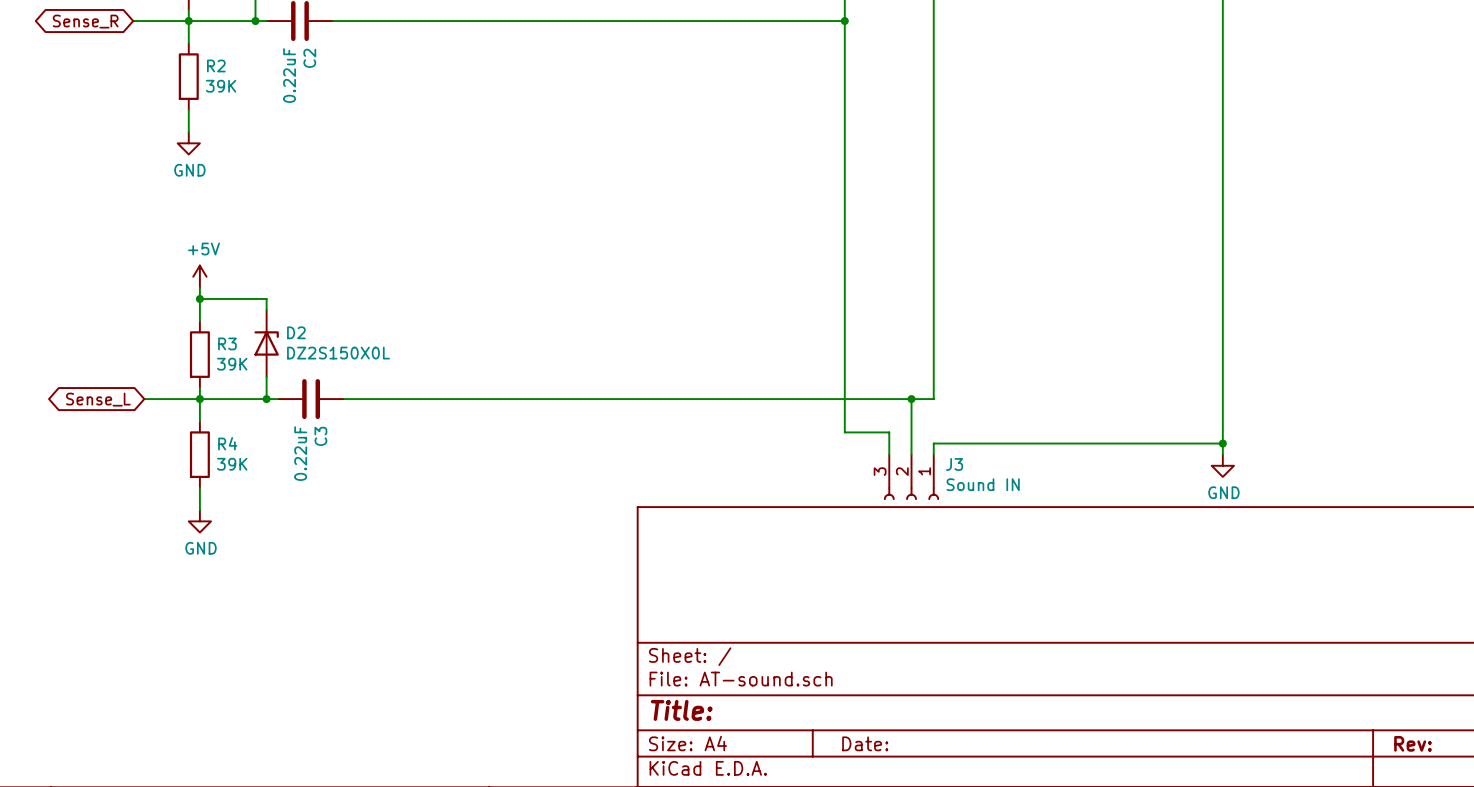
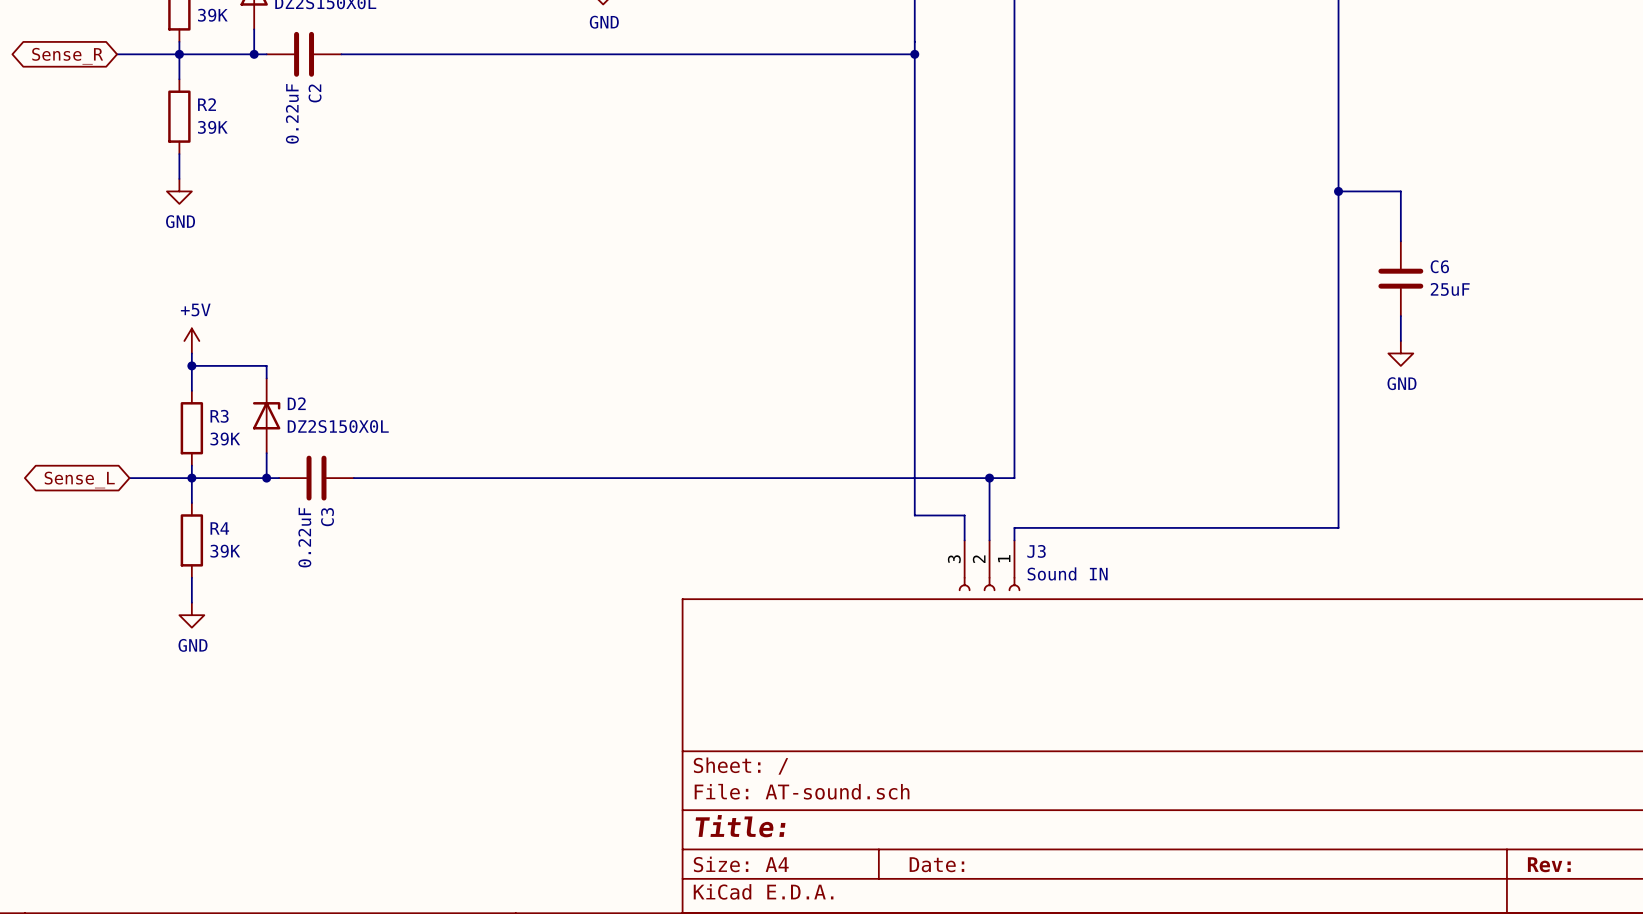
wire: none -> (1338, 191) (1400, 191) (1400, 241)
junction: none -> (1338, 191)
C6: none -> 25uF (1400, 278)
wire: none -> (1400, 316) (1400, 340)
wire: (1222, 443) (1222, 454) -> none
junction: (1222, 443) -> none
power symbol position: GND (1222, 465) -> GND (1400, 353)

